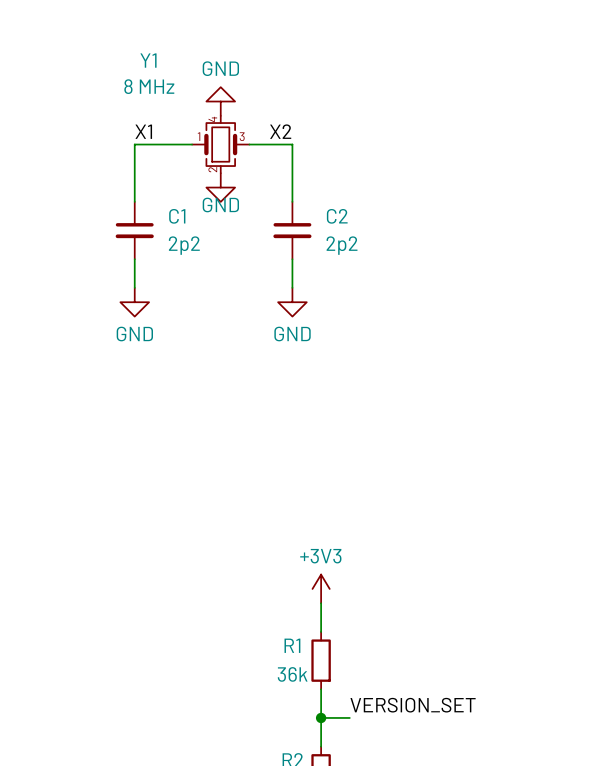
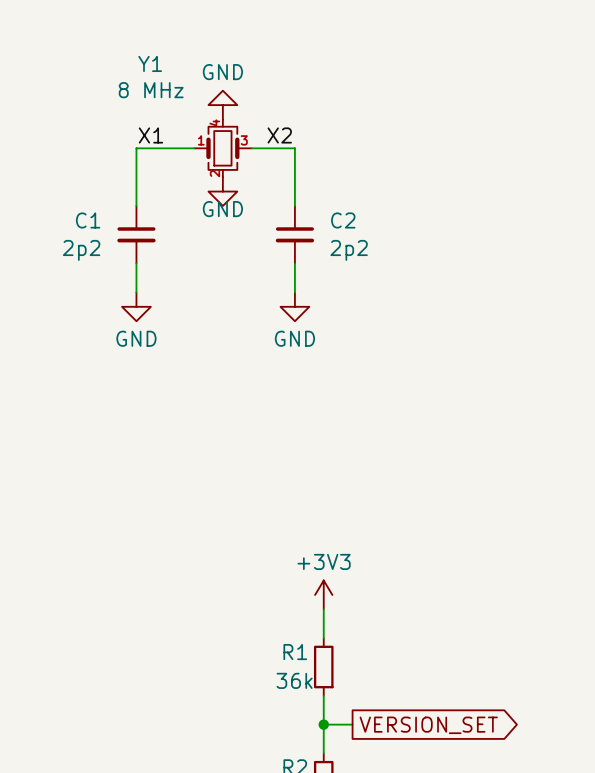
C1 name position: C1 (177, 216) -> C1 (88, 220)
C1 value position: 2p2 (184, 245) -> 2p2 (81, 250)
label: VERSION_SET (413, 705) -> none
global label: none -> VERSION_SET (428, 725)

